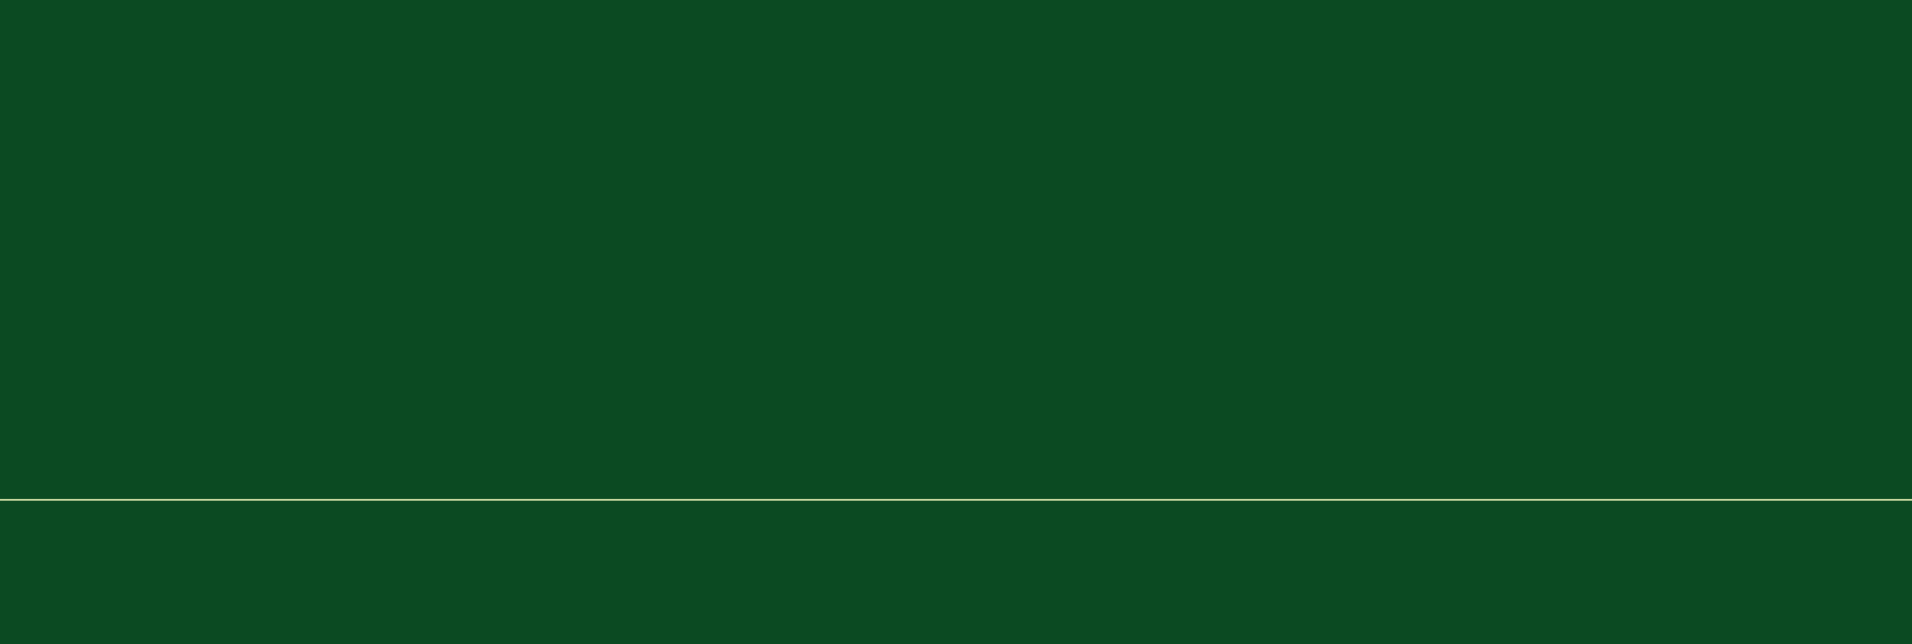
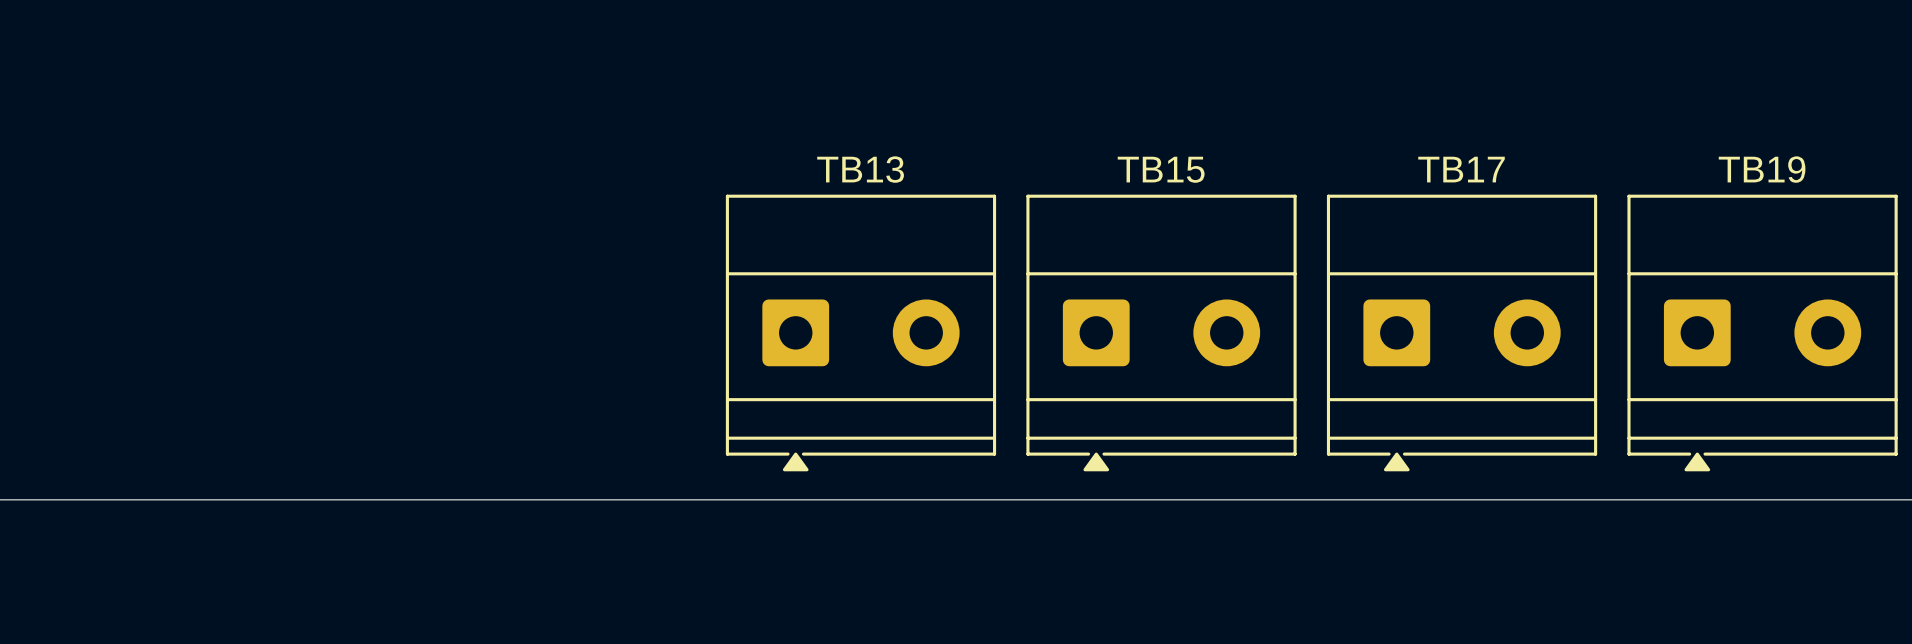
TB13: none -> (860, 332)
TB15: none -> (1161, 332)
TB17: none -> (1462, 332)
TB19: none -> (1762, 332)

